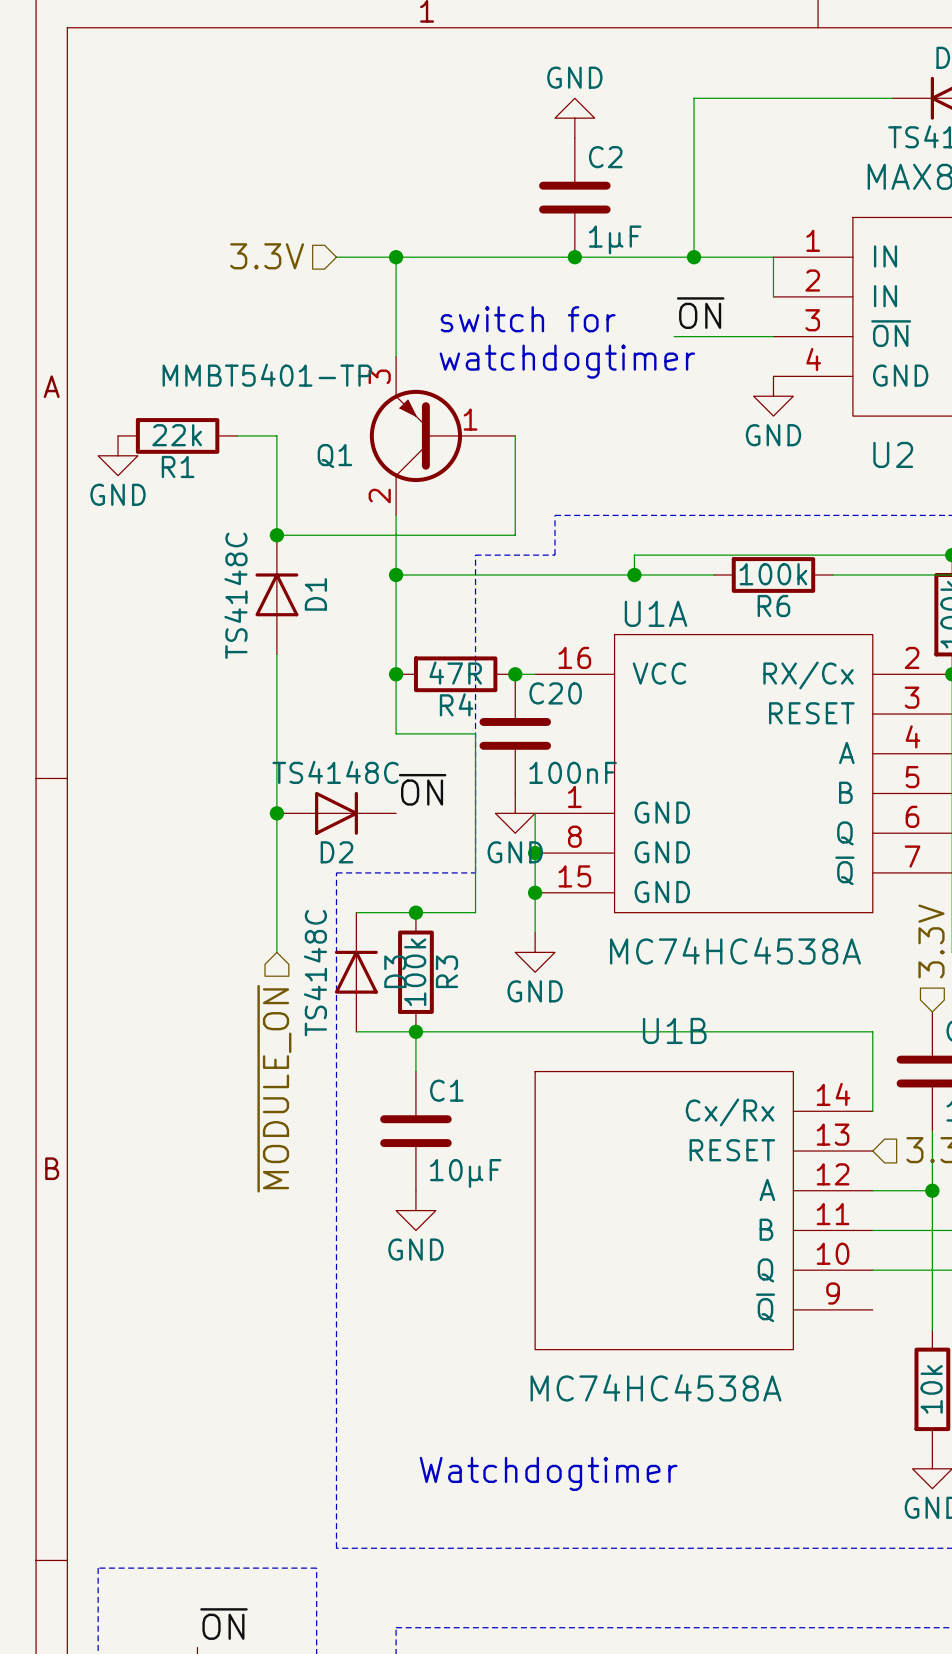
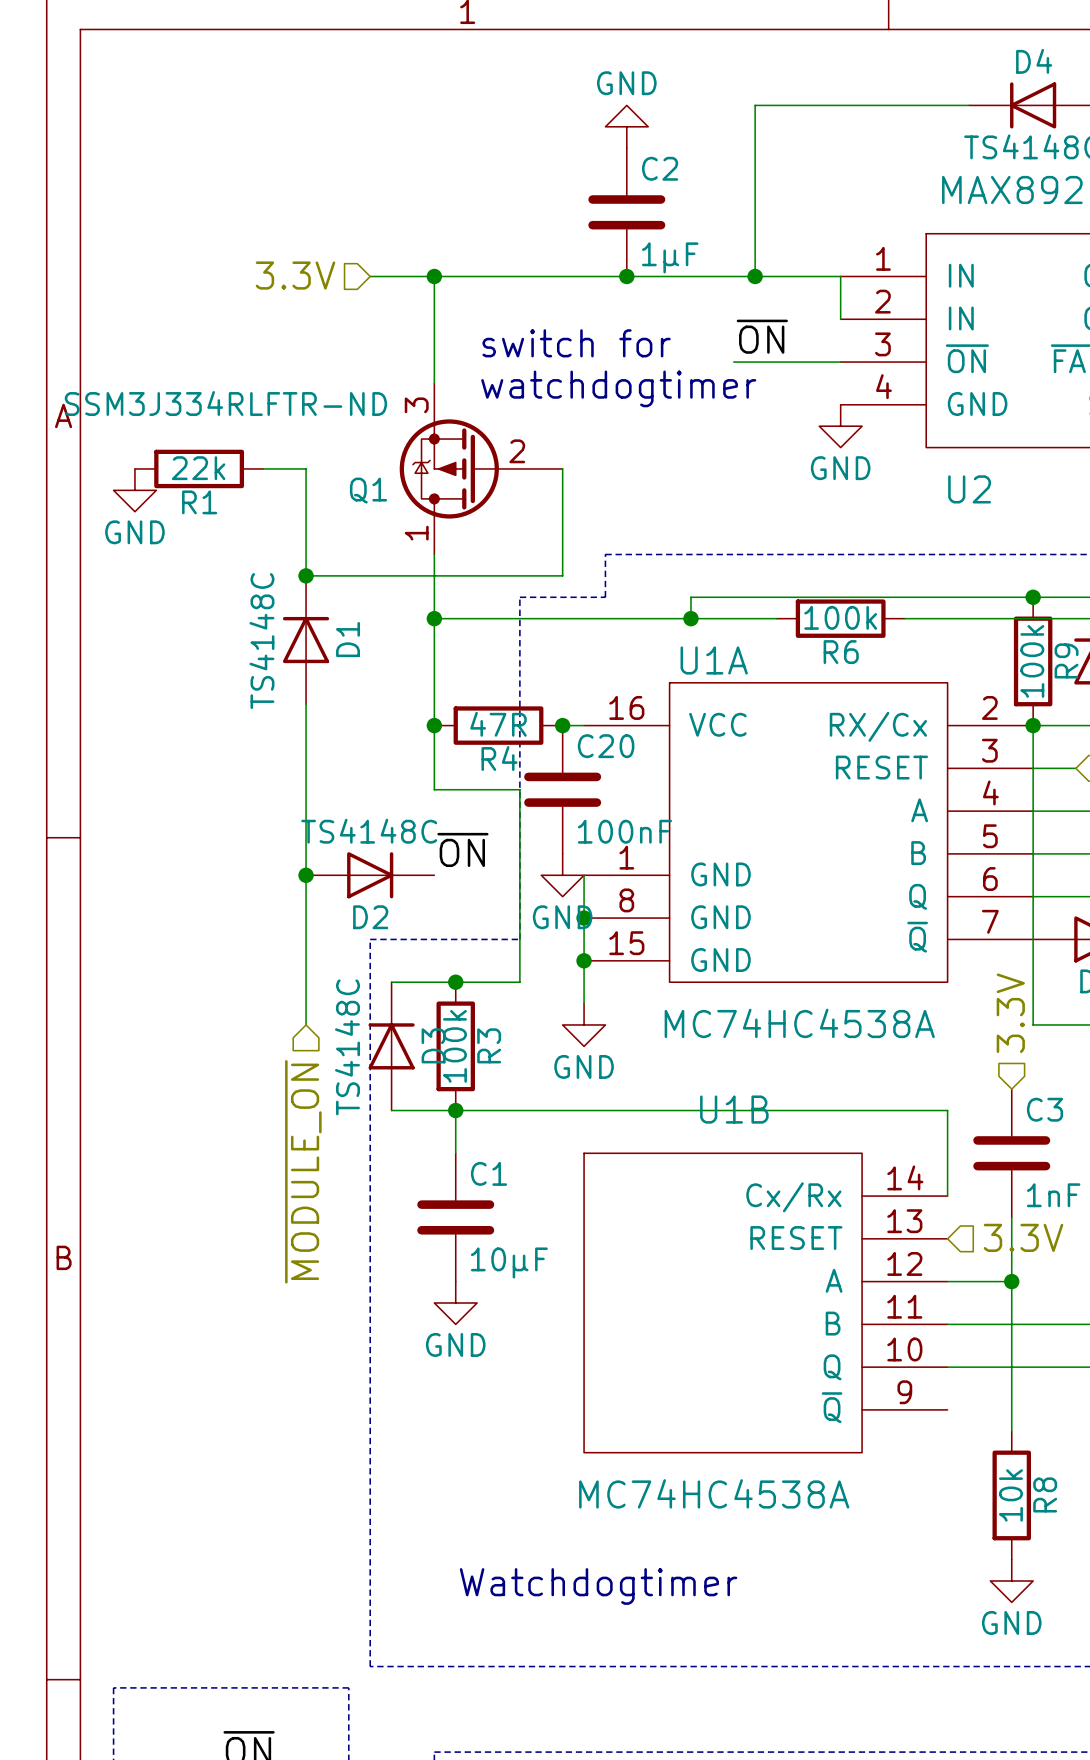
Q1 symbol: [369, 356, 516, 516] -> [399, 383, 563, 555]
Q1 value: MMBT5401-TP (267, 375) -> SSM3J334RLFTR-ND (225, 403)

